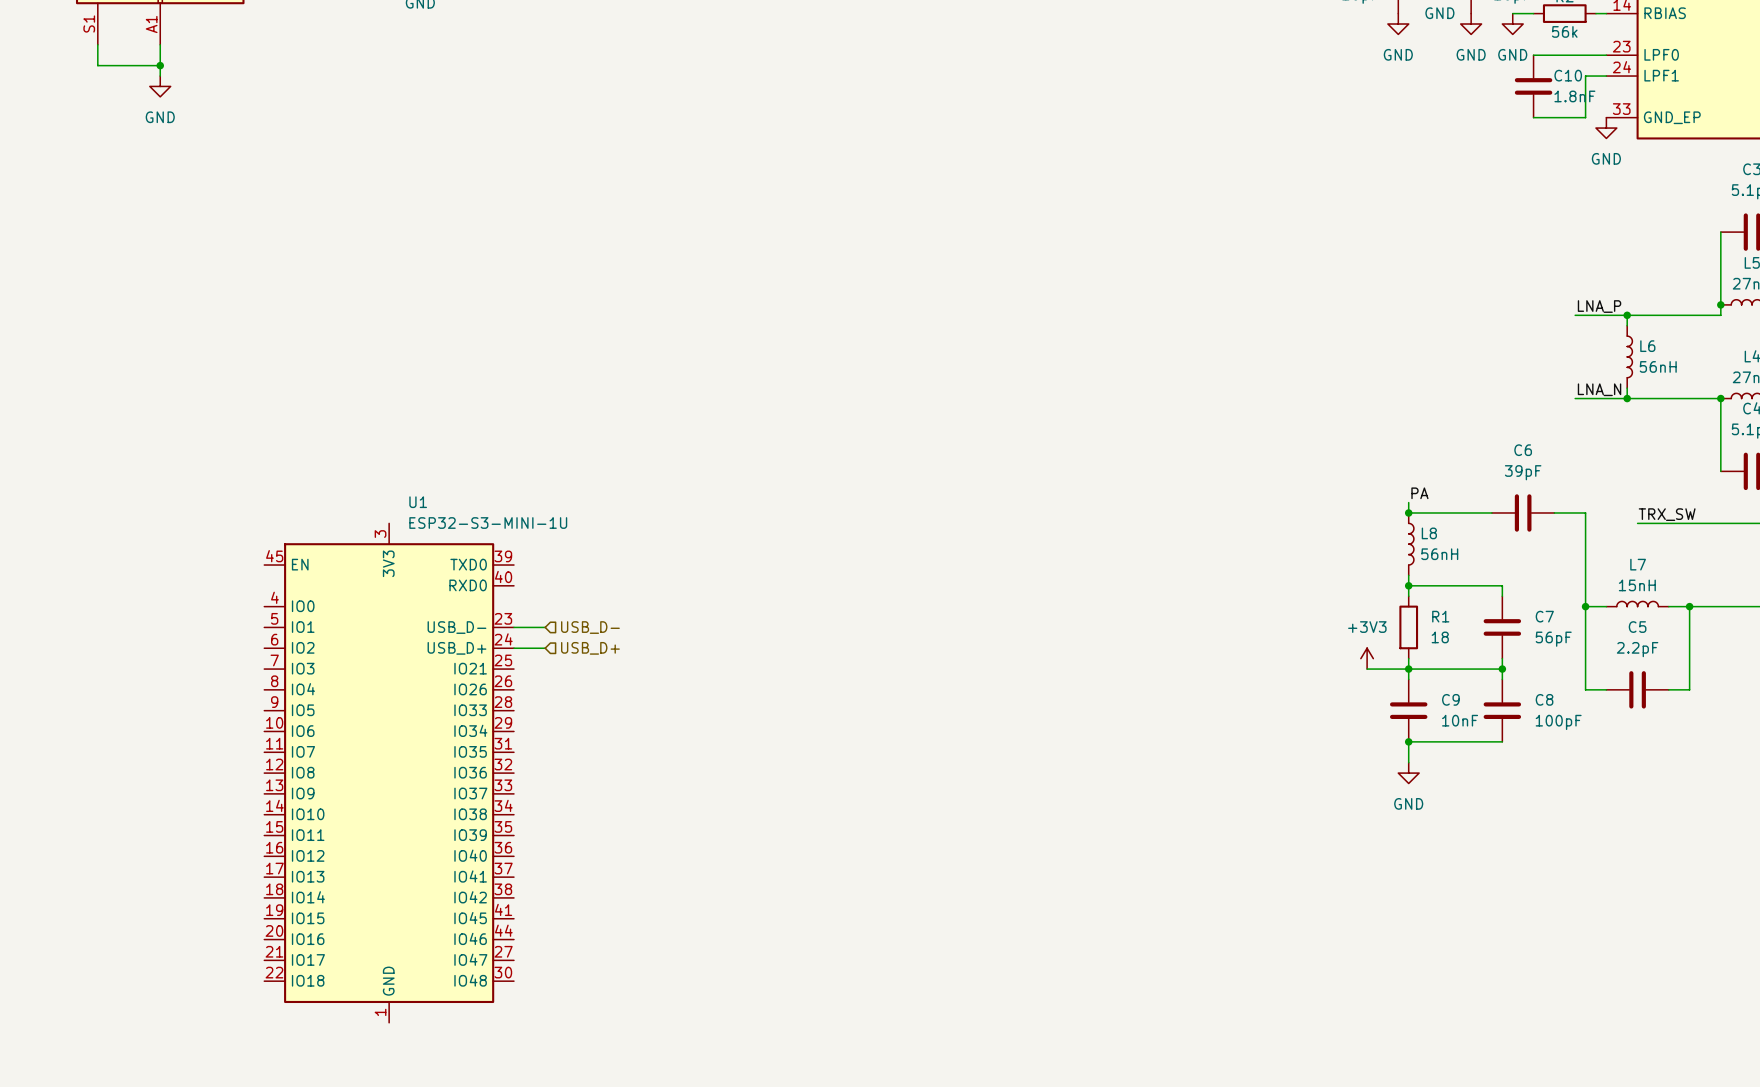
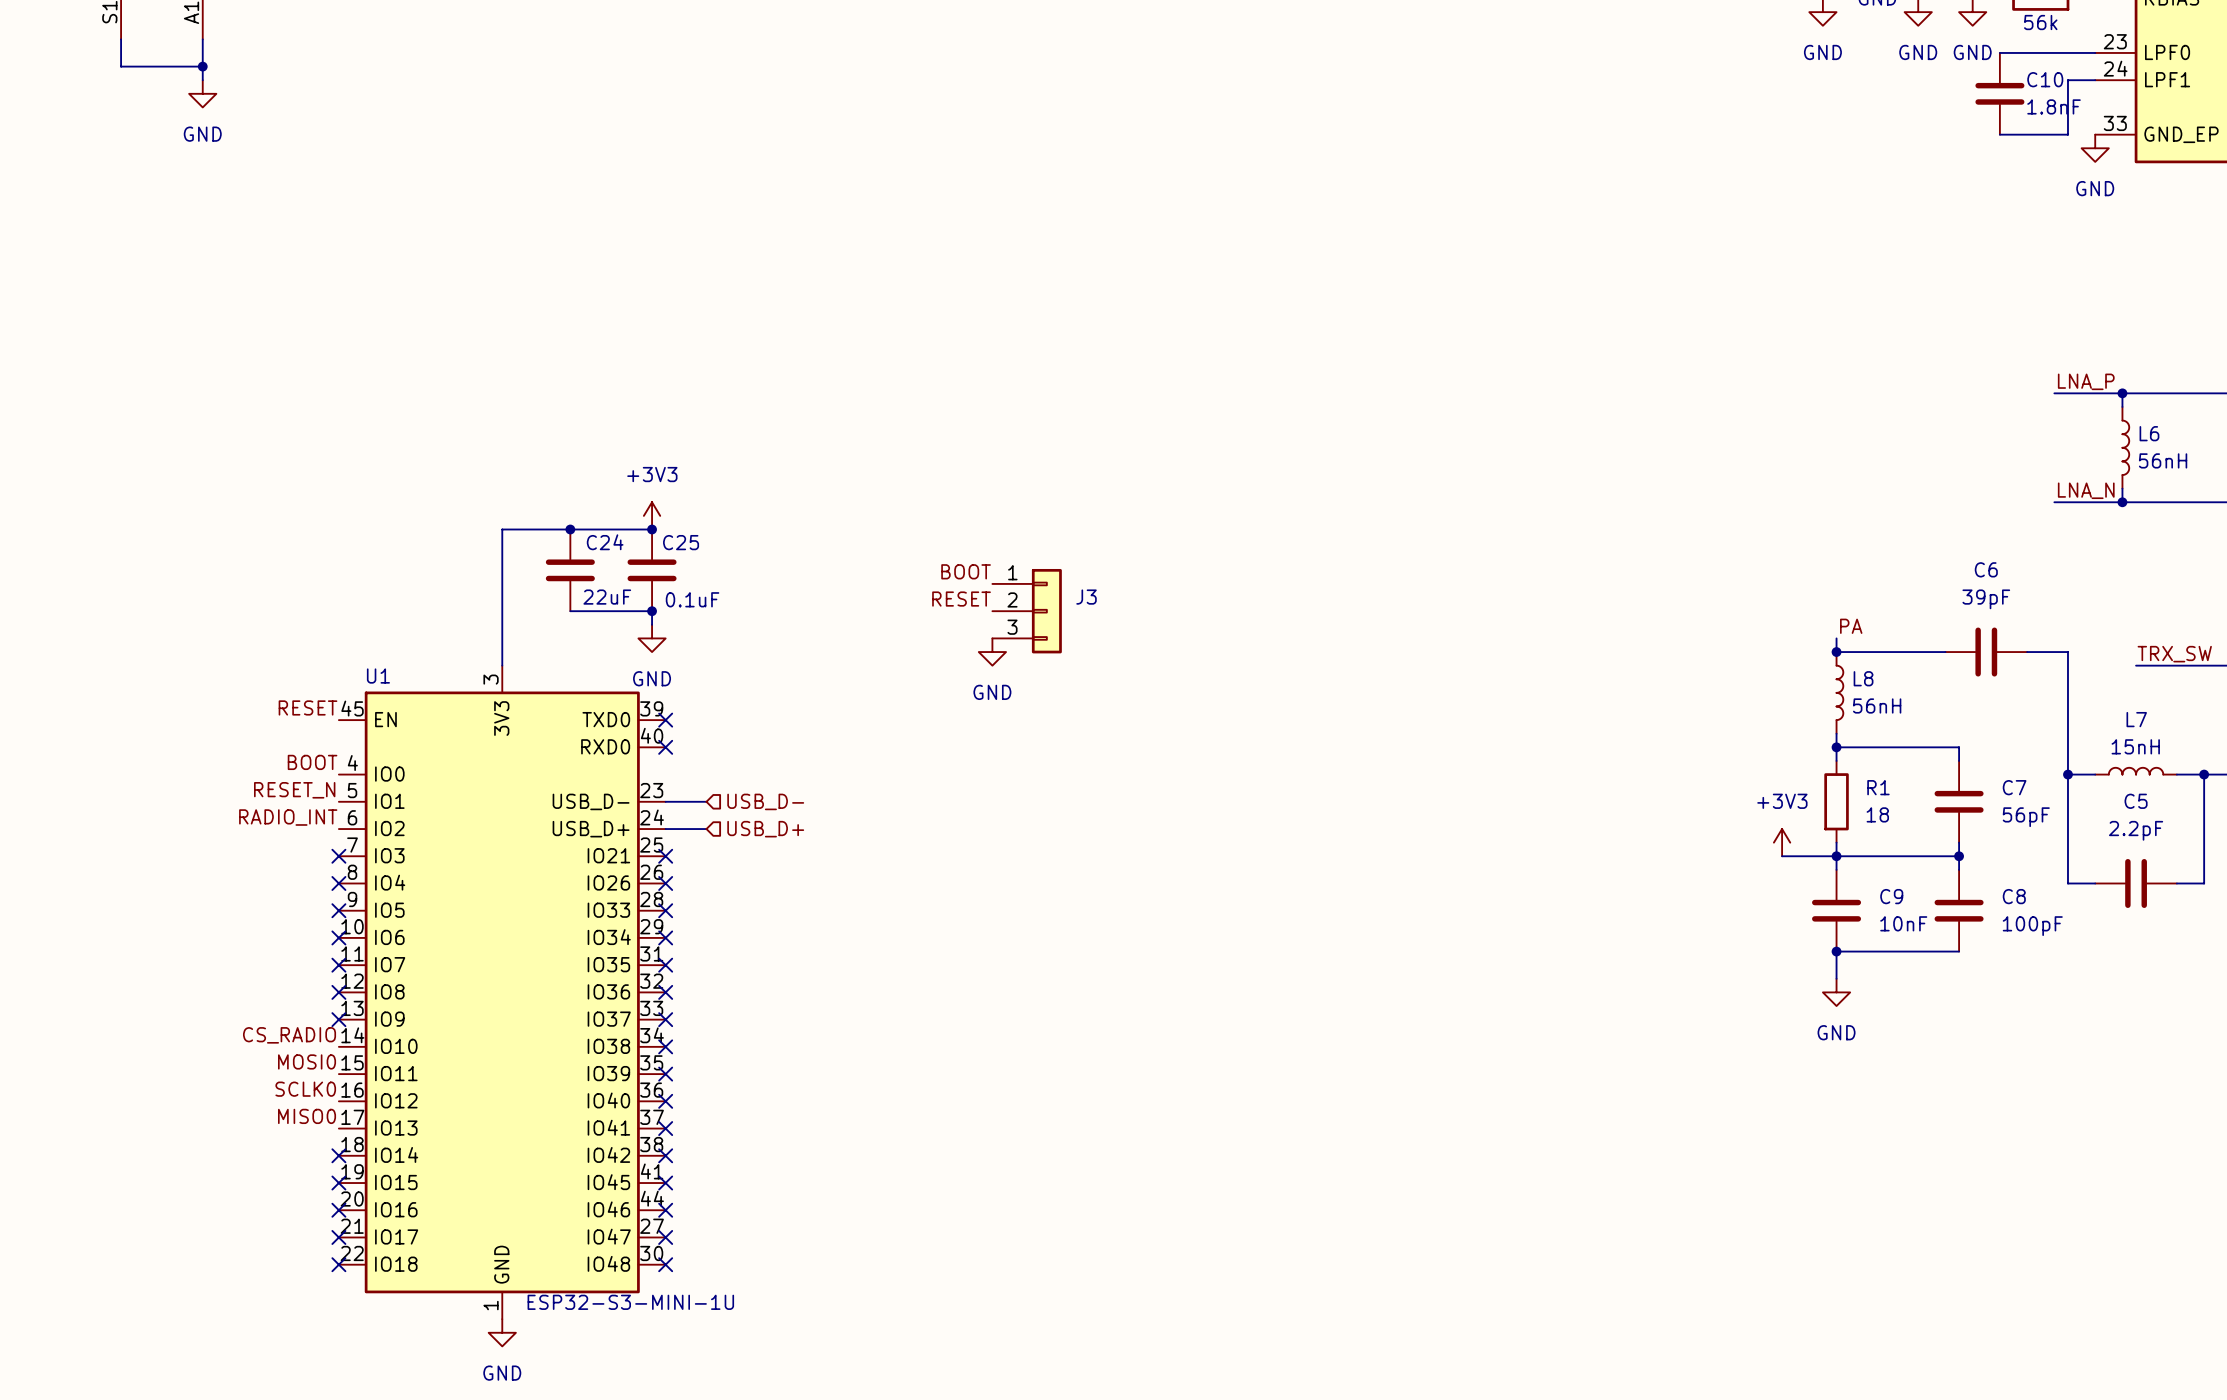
power symbol: none -> +3V3 (652, 515)
junction: none -> (570, 529)
wire: none -> (652, 529) (502, 529) (502, 665)
junction: none -> (652, 529)
C24: none -> 22uF (570, 570)
C25: none -> 0.1uF (652, 570)
label: none -> BOOT (966, 571)
label: none -> RESET (961, 599)
wire: none -> (570, 611) (652, 611) (652, 624)
junction: none -> (652, 611)
J3: none -> (1027, 611)
U1 name position: U1 (418, 502) -> U1 (378, 676)
power symbol: none -> GND (652, 638)
power symbol: none -> GND (992, 652)
U1 value position: ESP32-S3-MINI-1U (488, 523) -> ESP32-S3-MINI-1U (630, 1302)
label: none -> RESET (308, 707)
no-connect mark: none -> (665, 720)
no-connect mark: none -> (665, 747)
label: none -> BOOT (312, 762)
label: none -> RESET_N (294, 790)
label: none -> RADIO_INT (288, 817)
no-connect mark: none -> (338, 856)
no-connect mark: none -> (665, 856)
no-connect mark: none -> (338, 883)
no-connect mark: none -> (665, 883)
no-connect mark: none -> (338, 910)
no-connect mark: none -> (665, 910)
no-connect mark: none -> (338, 937)
no-connect mark: none -> (665, 937)
no-connect mark: none -> (338, 965)
no-connect mark: none -> (665, 965)
no-connect mark: none -> (338, 992)
no-connect mark: none -> (665, 992)
no-connect mark: none -> (338, 1019)
no-connect mark: none -> (665, 1019)
label: none -> CS_RADIO (289, 1035)
no-connect mark: none -> (665, 1046)
label: none -> MOSI0 (307, 1061)
no-connect mark: none -> (665, 1074)
label: none -> SCLK0 (305, 1089)
no-connect mark: none -> (665, 1101)
label: none -> MISO0 (307, 1116)
no-connect mark: none -> (665, 1128)
no-connect mark: none -> (338, 1155)
no-connect mark: none -> (665, 1155)
no-connect mark: none -> (338, 1183)
no-connect mark: none -> (665, 1183)
no-connect mark: none -> (338, 1210)
no-connect mark: none -> (665, 1210)
no-connect mark: none -> (338, 1237)
no-connect mark: none -> (665, 1237)
no-connect mark: none -> (338, 1264)
no-connect mark: none -> (665, 1264)
power symbol: none -> GND (502, 1332)

